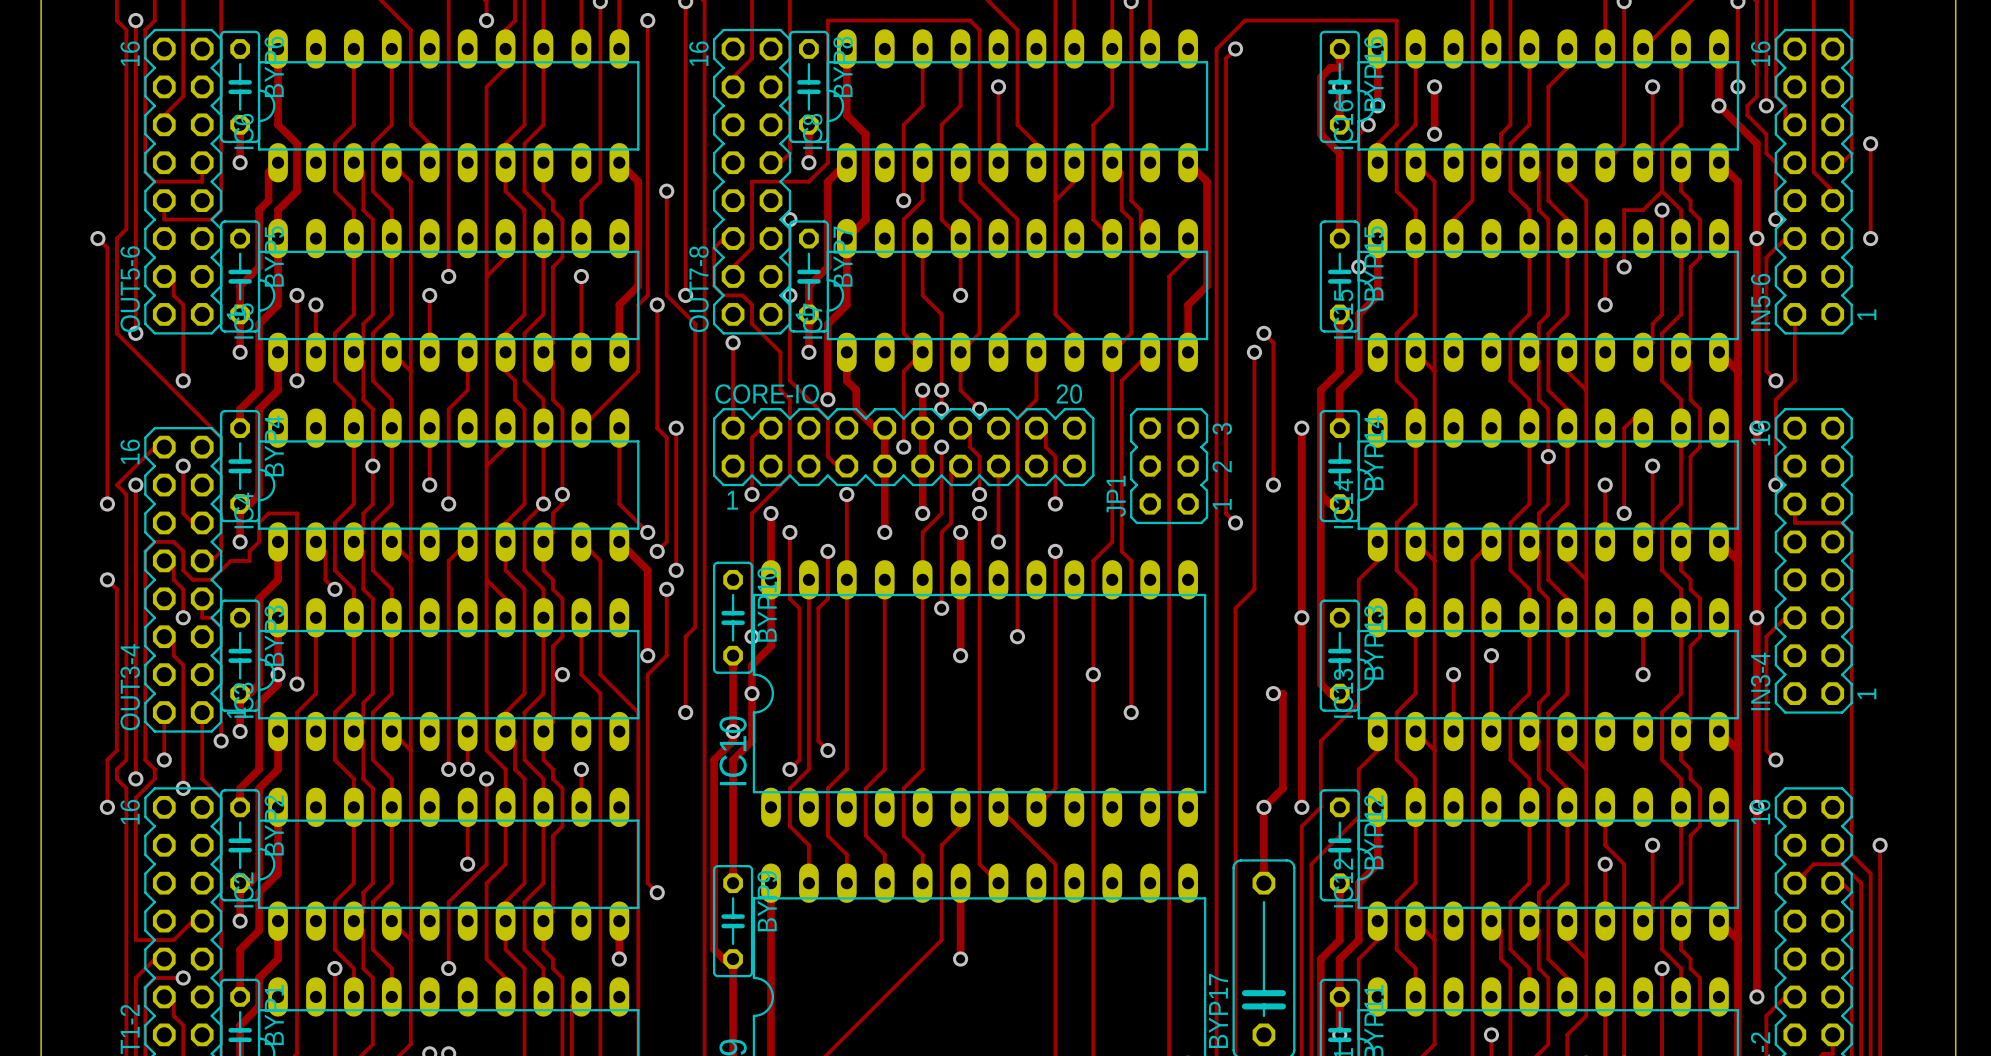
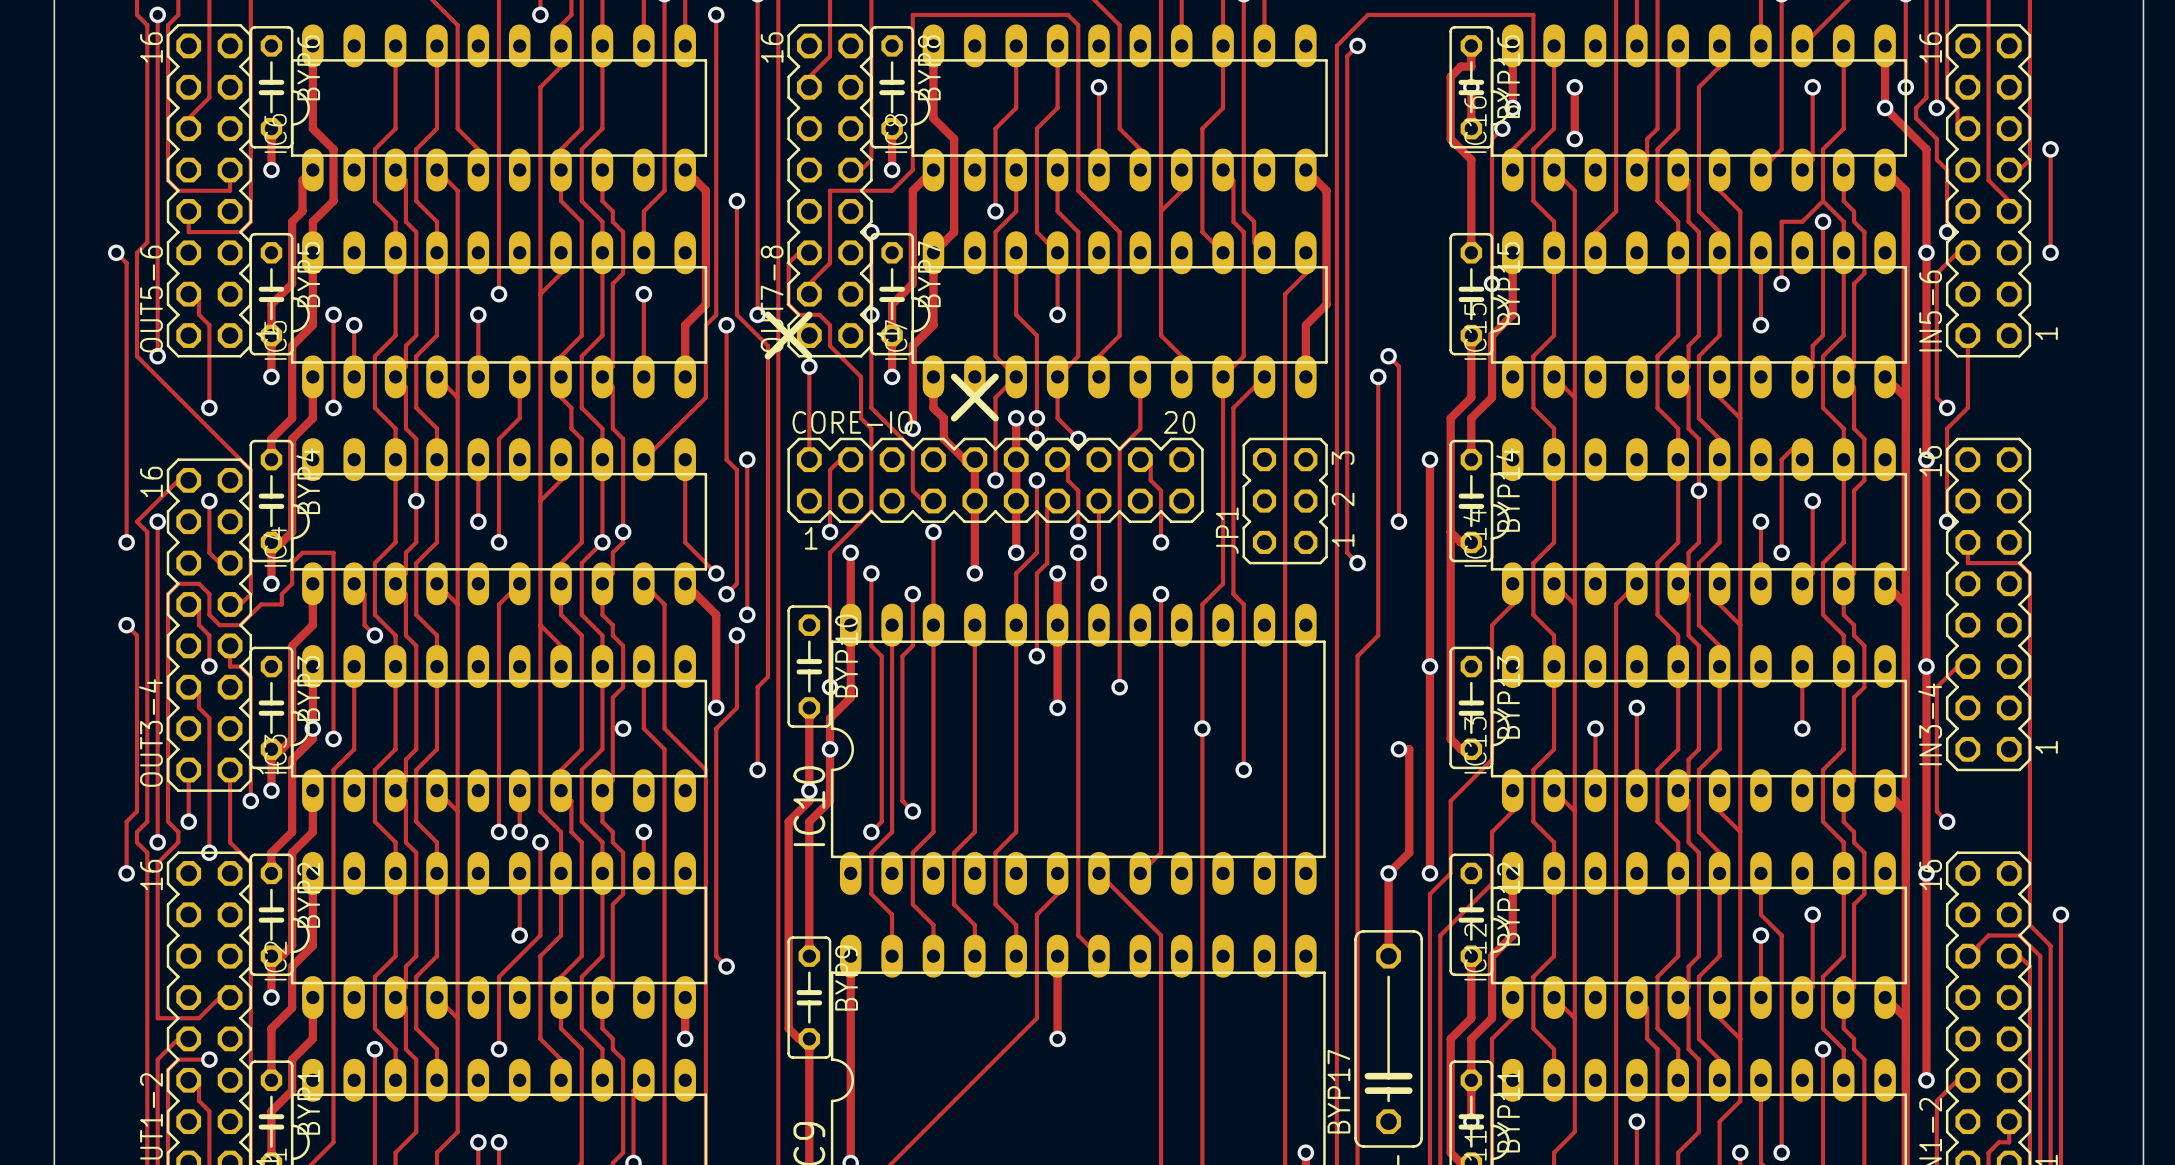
line: none -> (767, 314) (809, 356)
line: none -> (809, 314) (767, 356)
line: none -> (954, 376) (995, 418)
line: none -> (995, 376) (954, 418)

